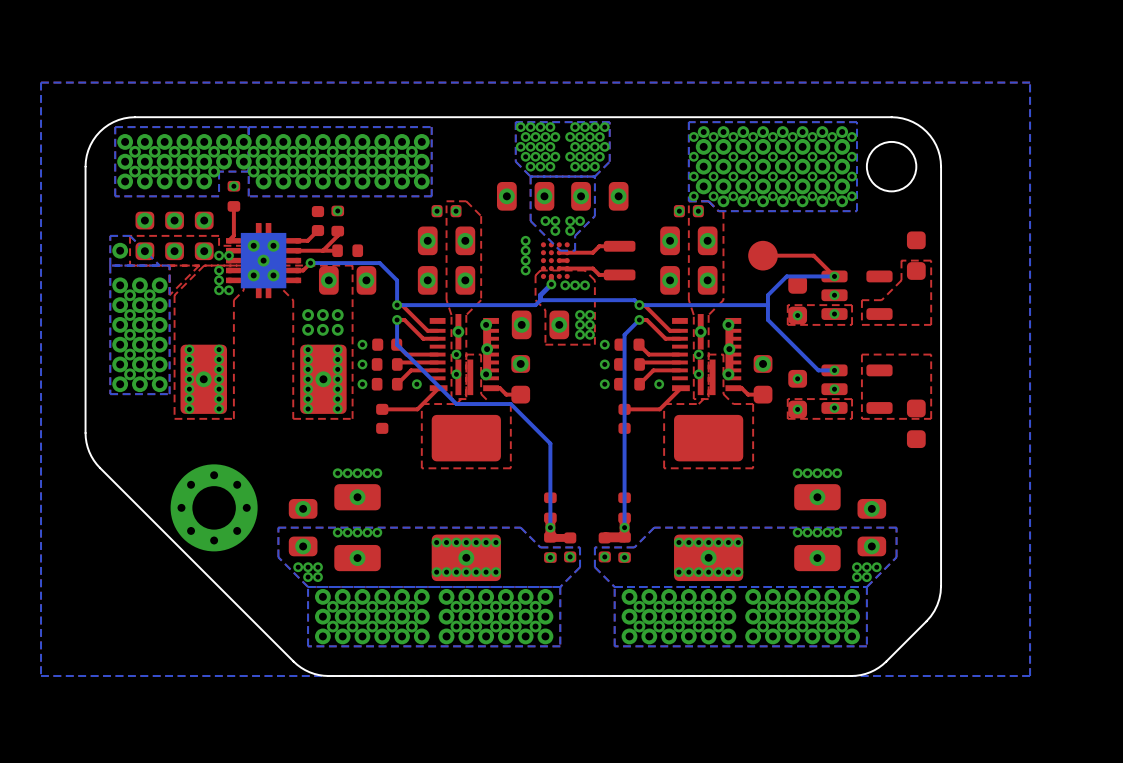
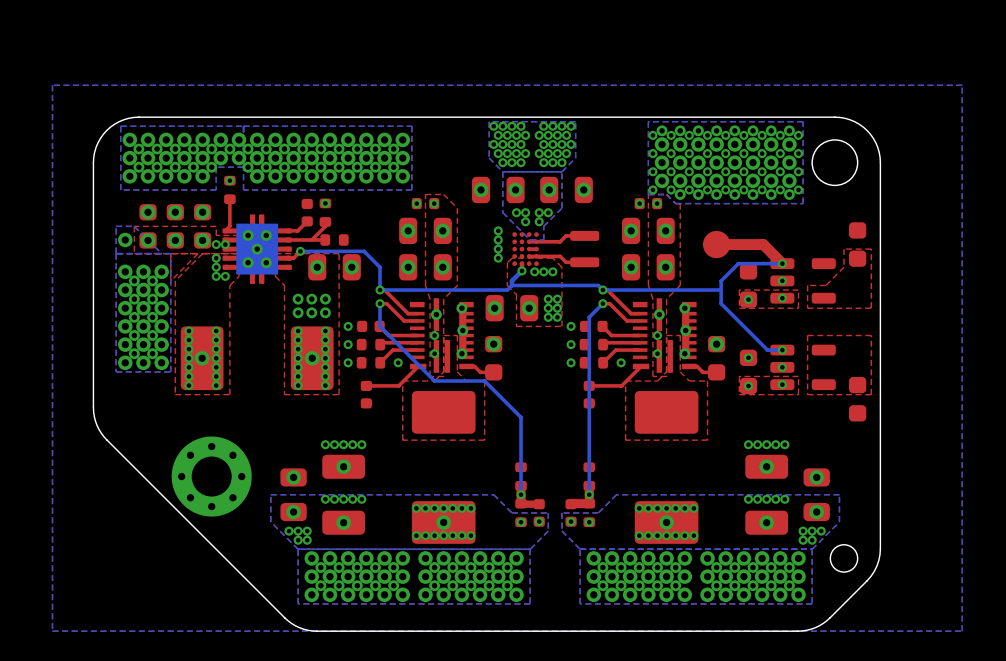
top track width: thin (763, 255) (813, 255) (834, 276) -> thick (716, 244) (763, 244) (782, 263)
round board edge: none -> [829, 544, 859, 573]

